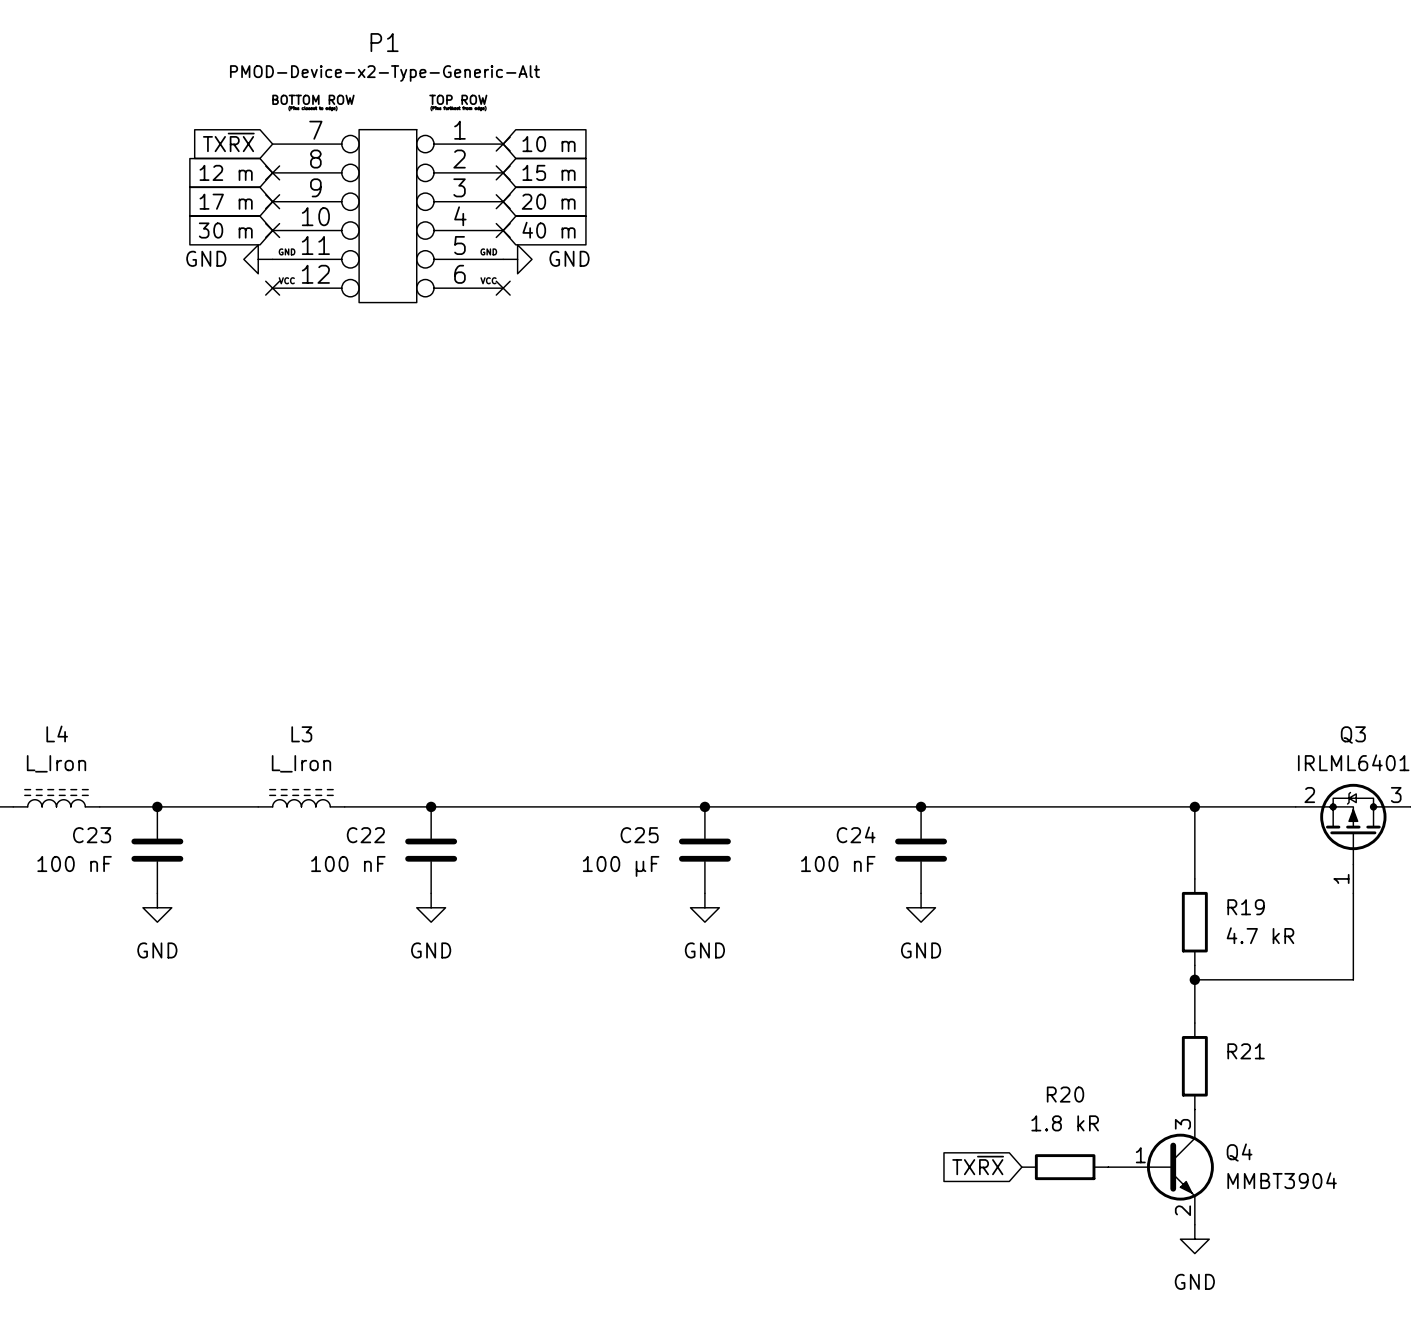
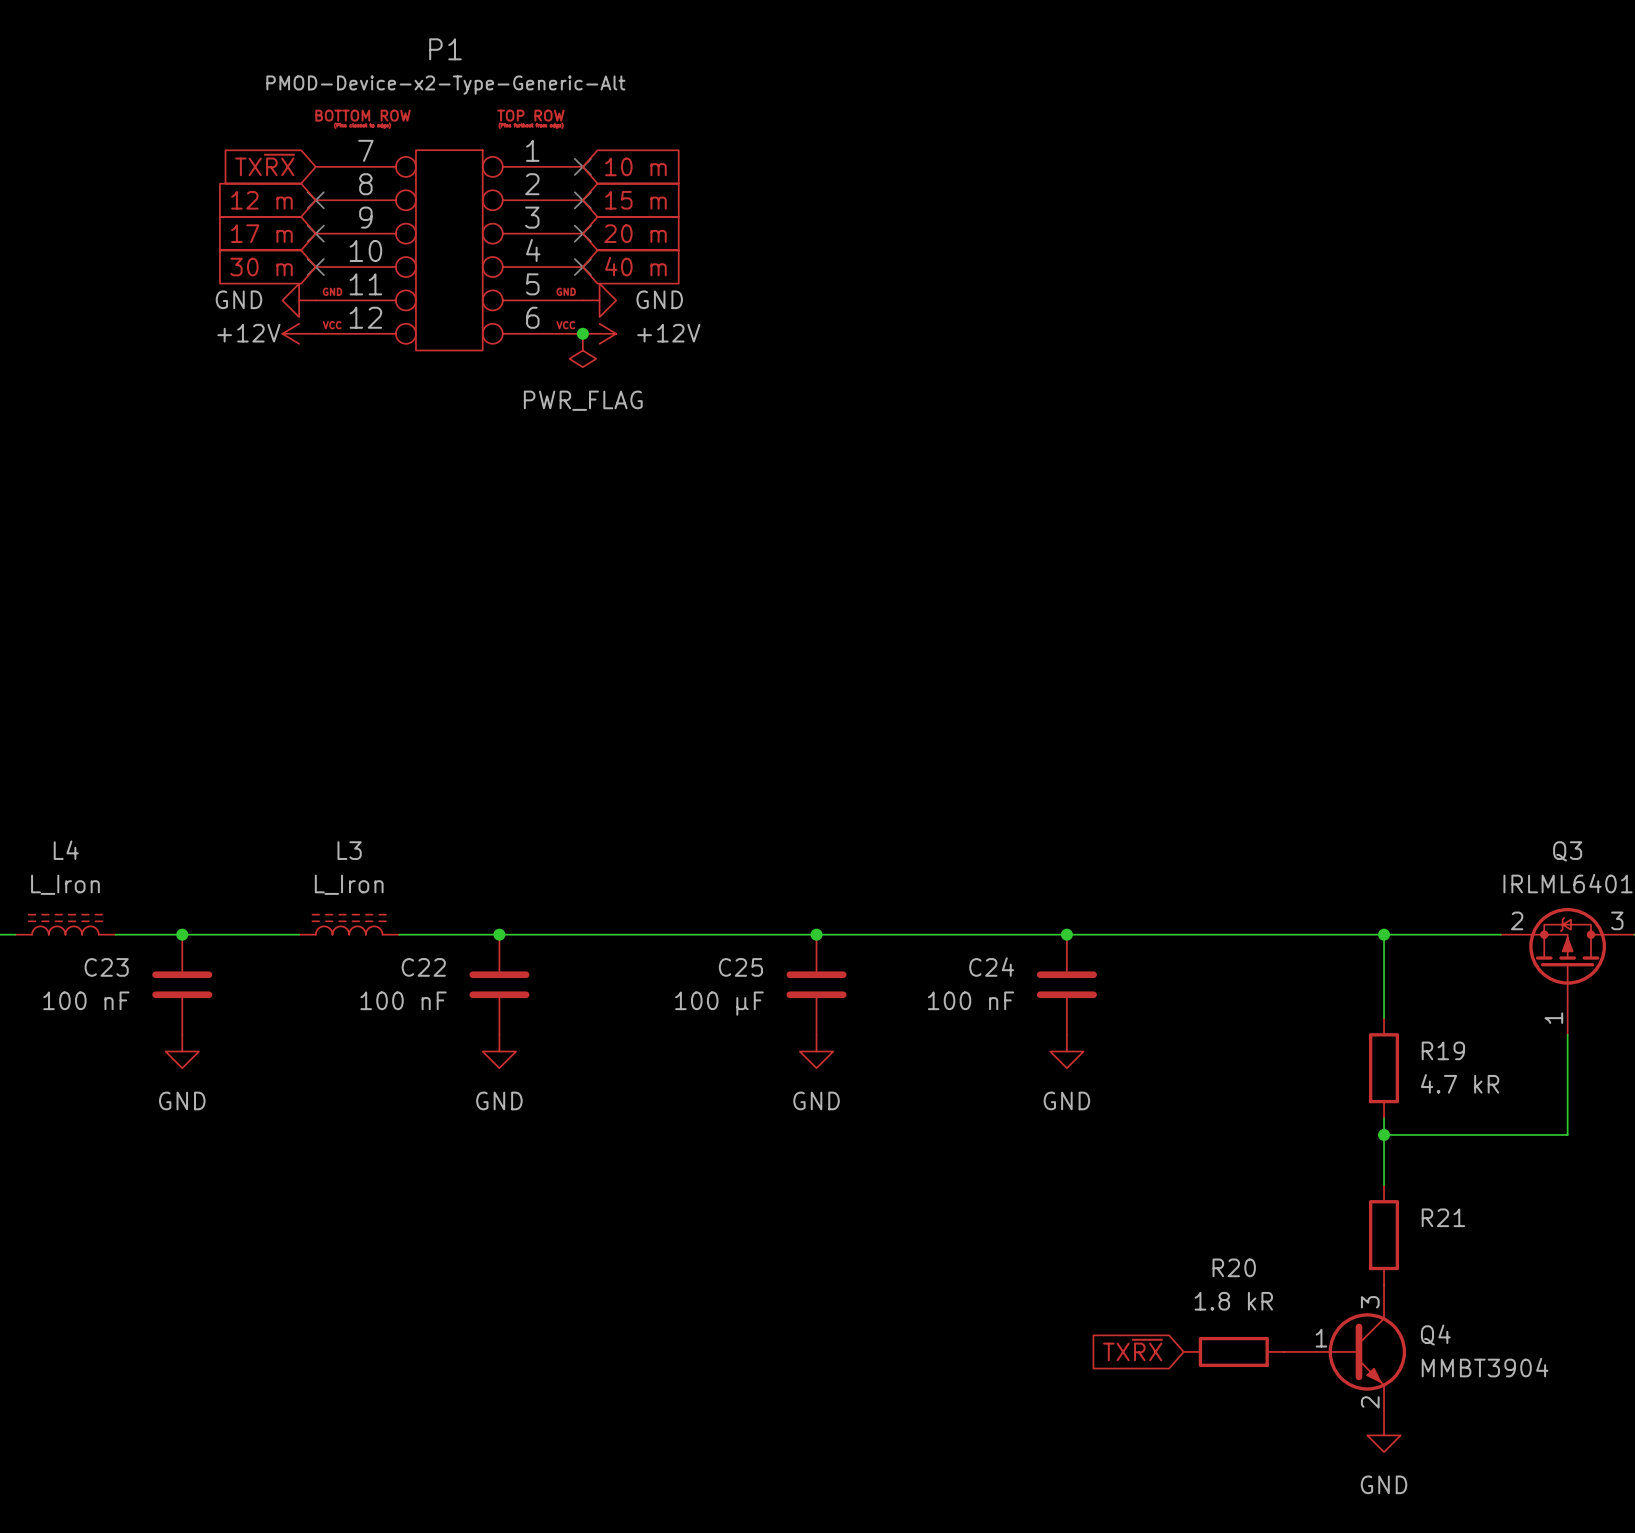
power symbol: none -> +12V (299, 333)
no-connect mark: (272, 288) -> none
no-connect mark: (503, 288) -> none
junction: none -> (582, 333)
power symbol: none -> +12V (599, 333)
power symbol: none -> PWR_FLAG (582, 350)

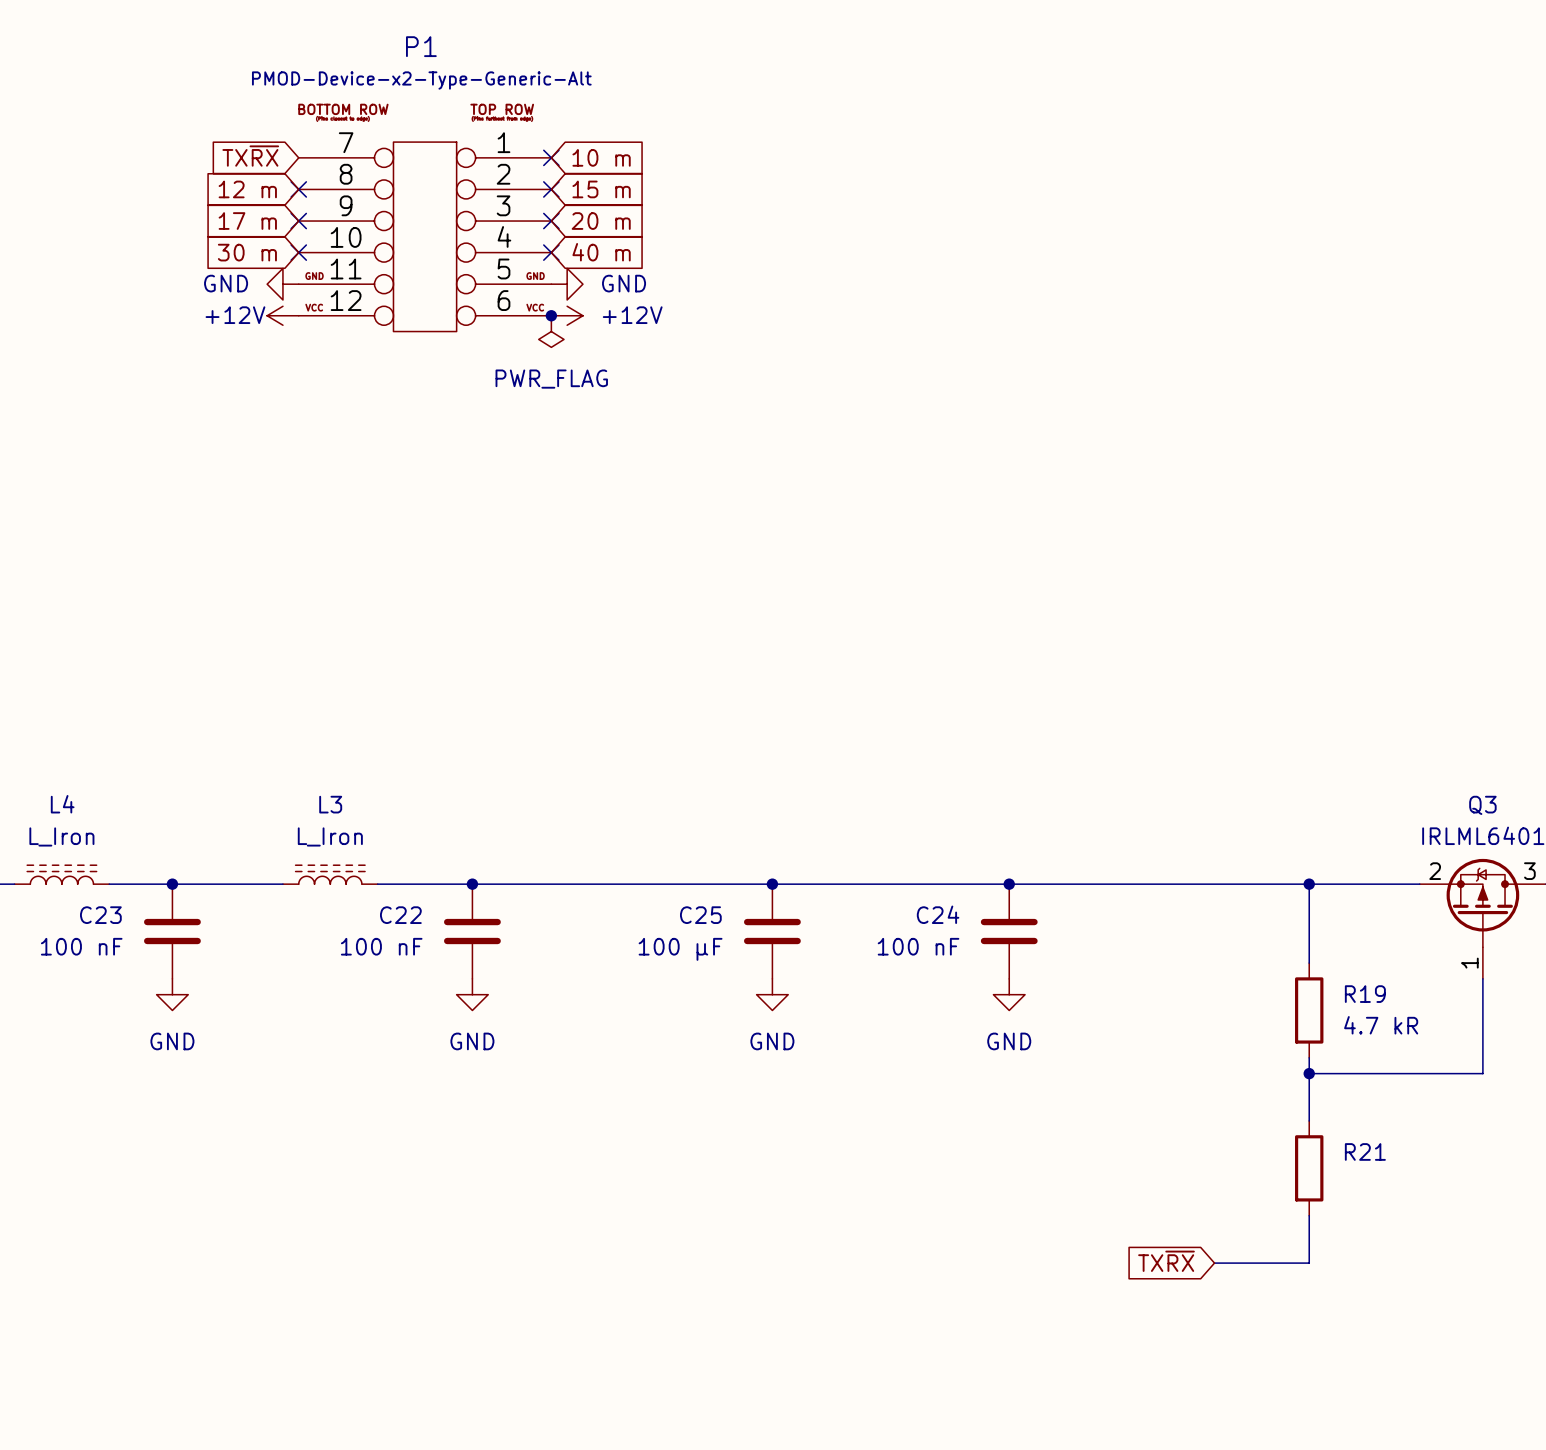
wire: none -> (1309, 1215) (1309, 1263) (1214, 1263)
global label position: TX~{RX} (1133, 1350) -> TX~{RX} (1166, 1261)
R20: 1.8 kR (1233, 1351) -> none
Q4: MMBT3904 (1344, 1351) -> none
power symbol: GND (1384, 1435) -> none

